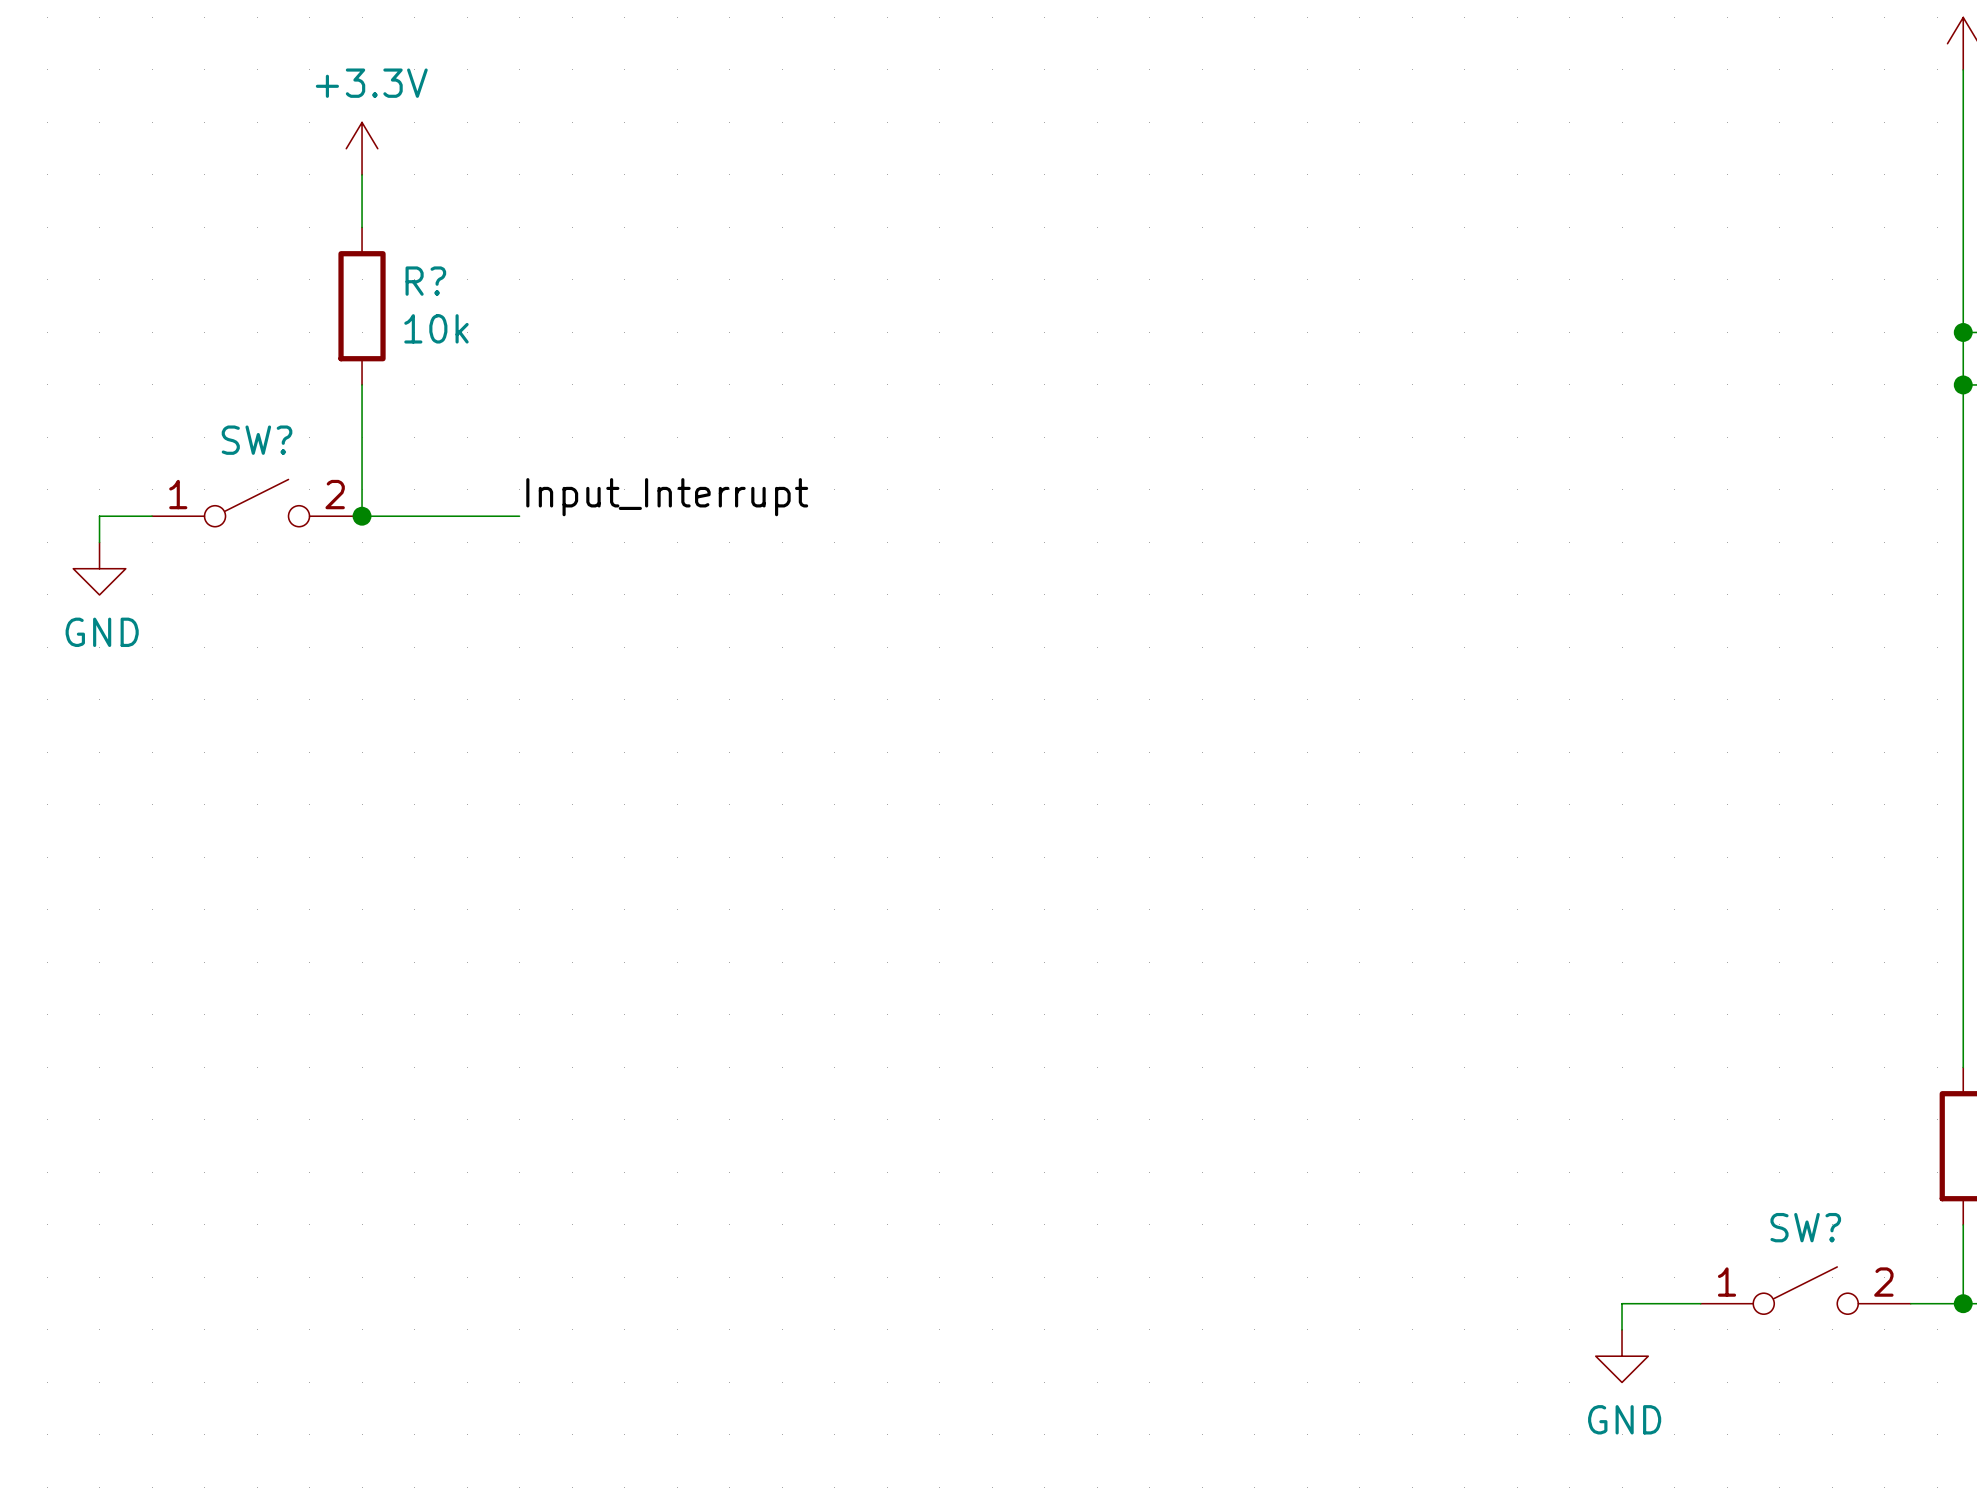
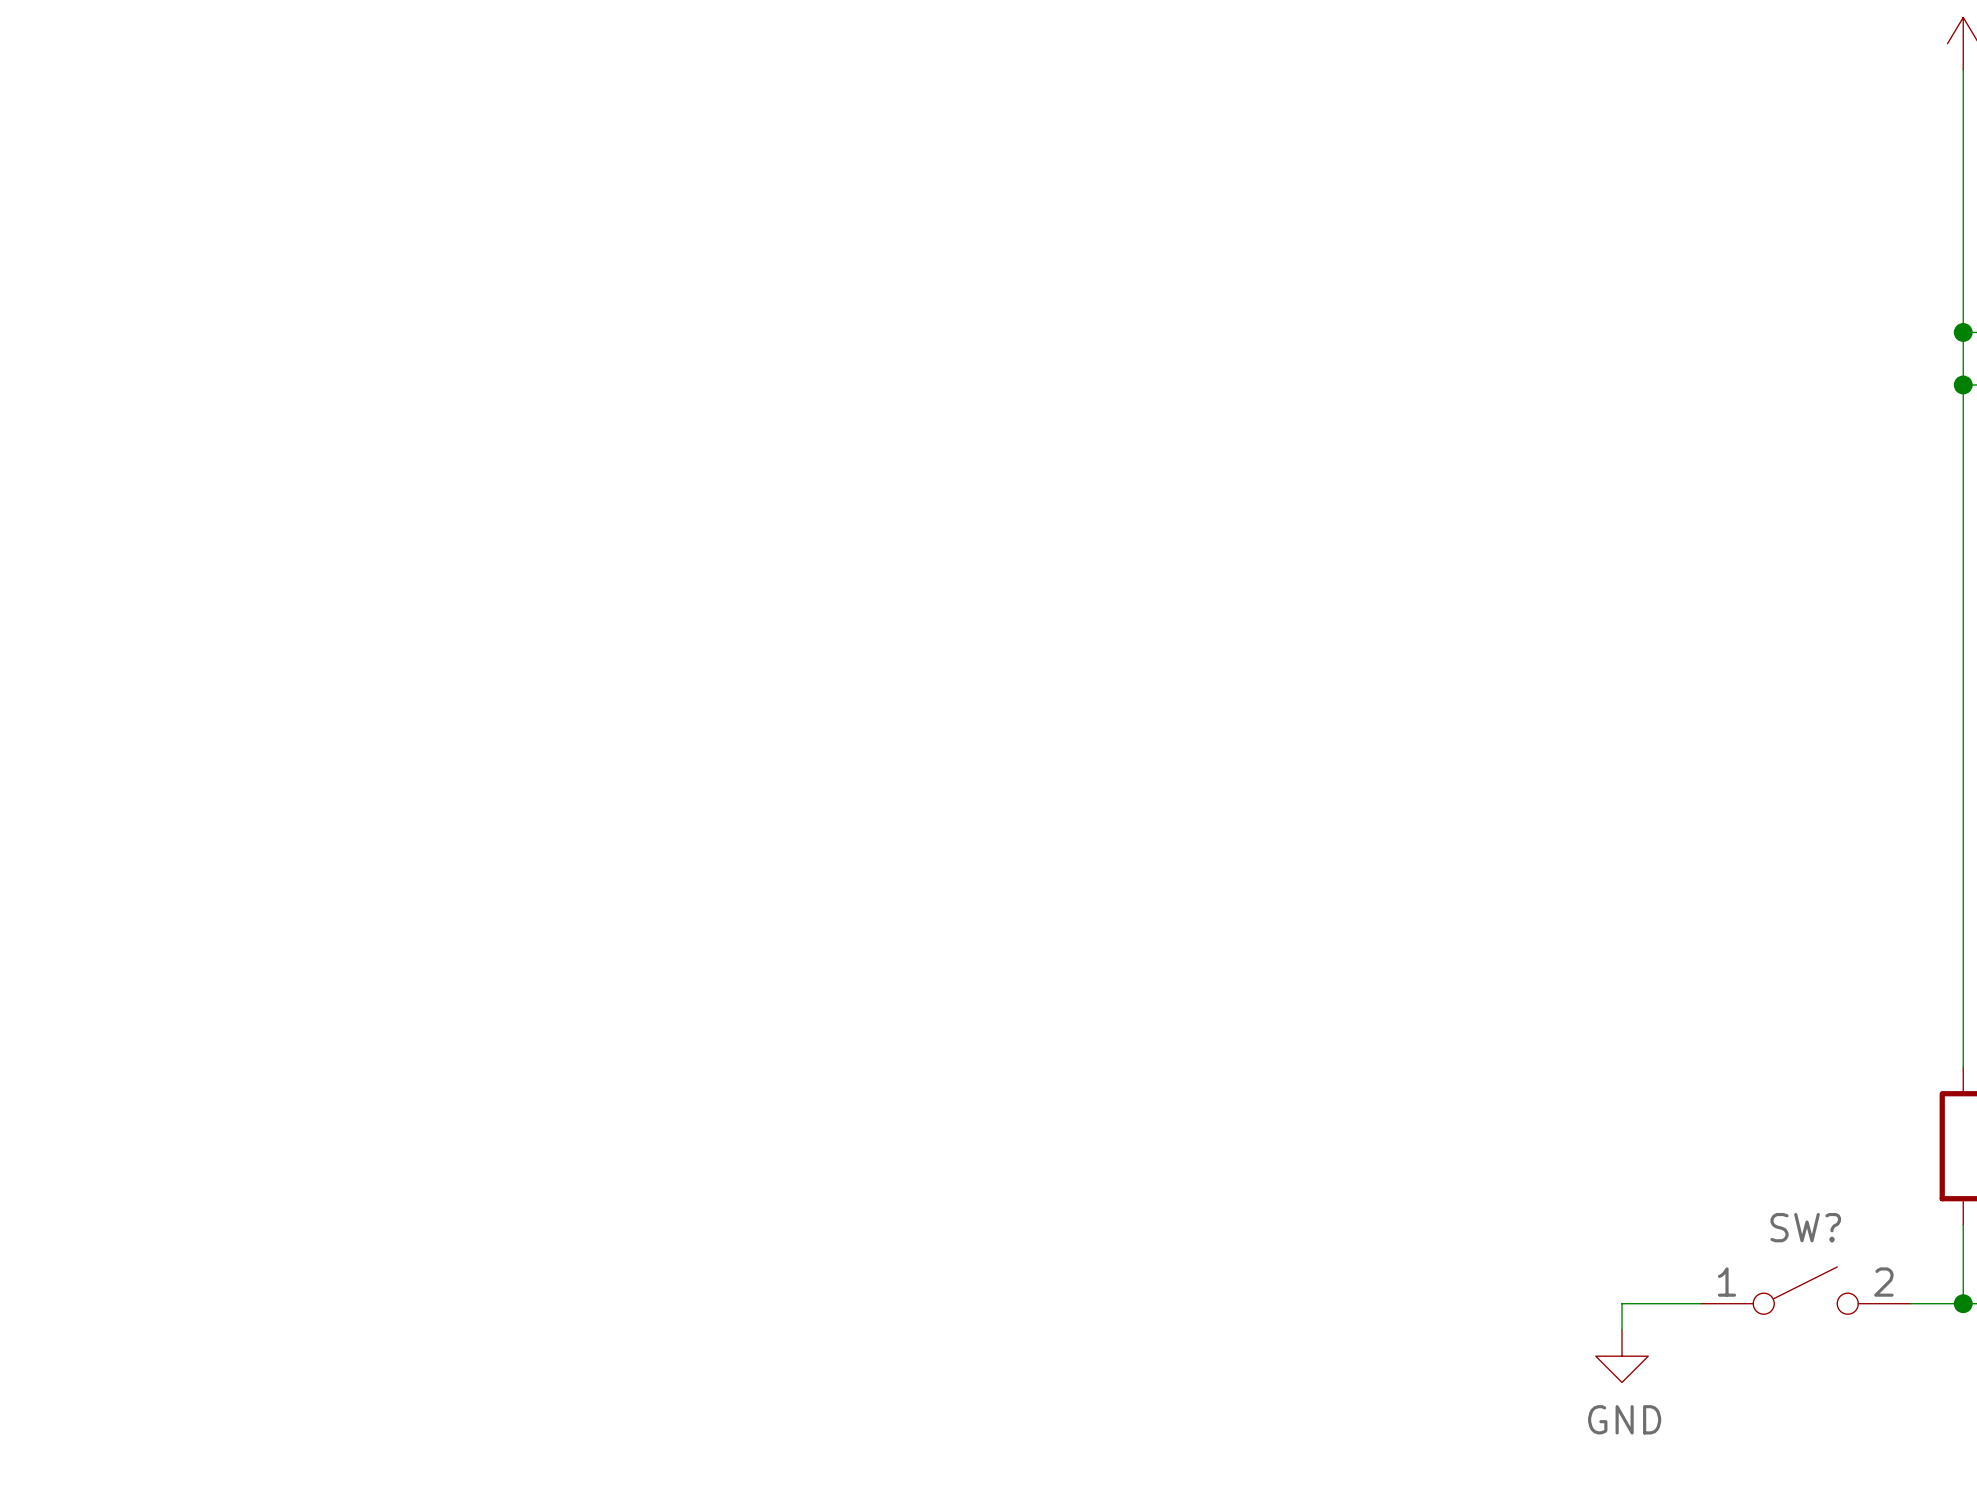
power symbol: +3.3V (362, 148) -> none
wire: (362, 174) (362, 227) -> none
R?: 10k (362, 306) -> none
wire: (362, 384) (362, 516) (519, 516) -> none
label: Input_Interrupt (667, 497) -> none
SW?: (257, 503) -> none
wire: (152, 516) (99, 516) (99, 542) -> none
junction: (362, 516) -> none
power symbol: GND (99, 568) -> none

